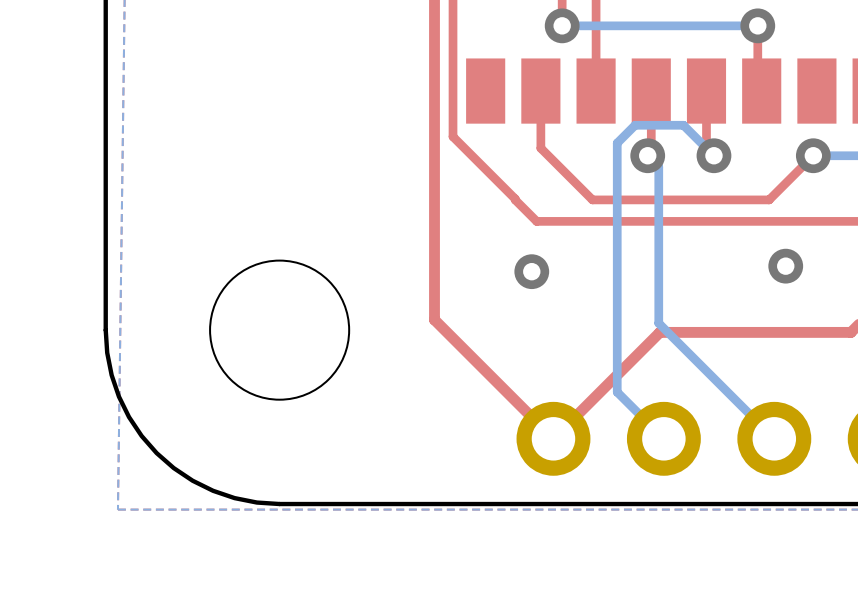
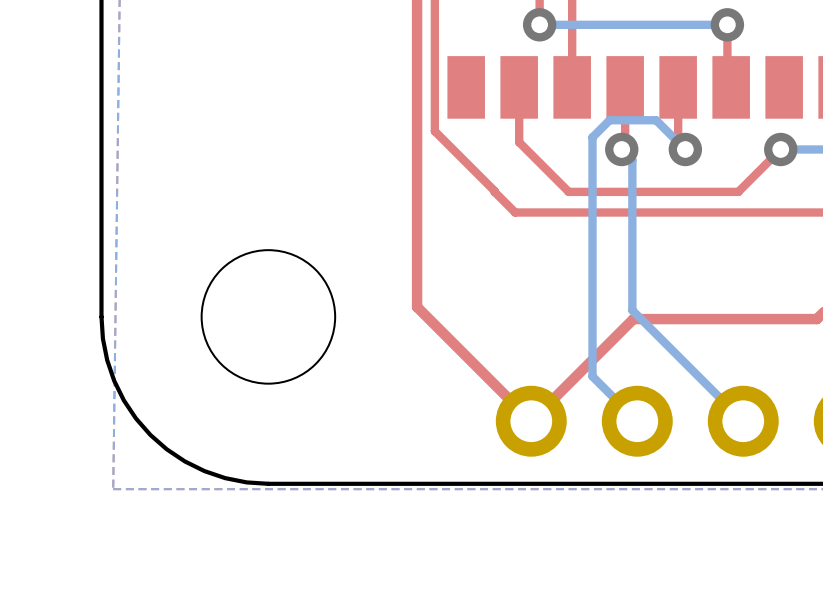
via: (785, 266) -> none
via: (531, 271) -> none

